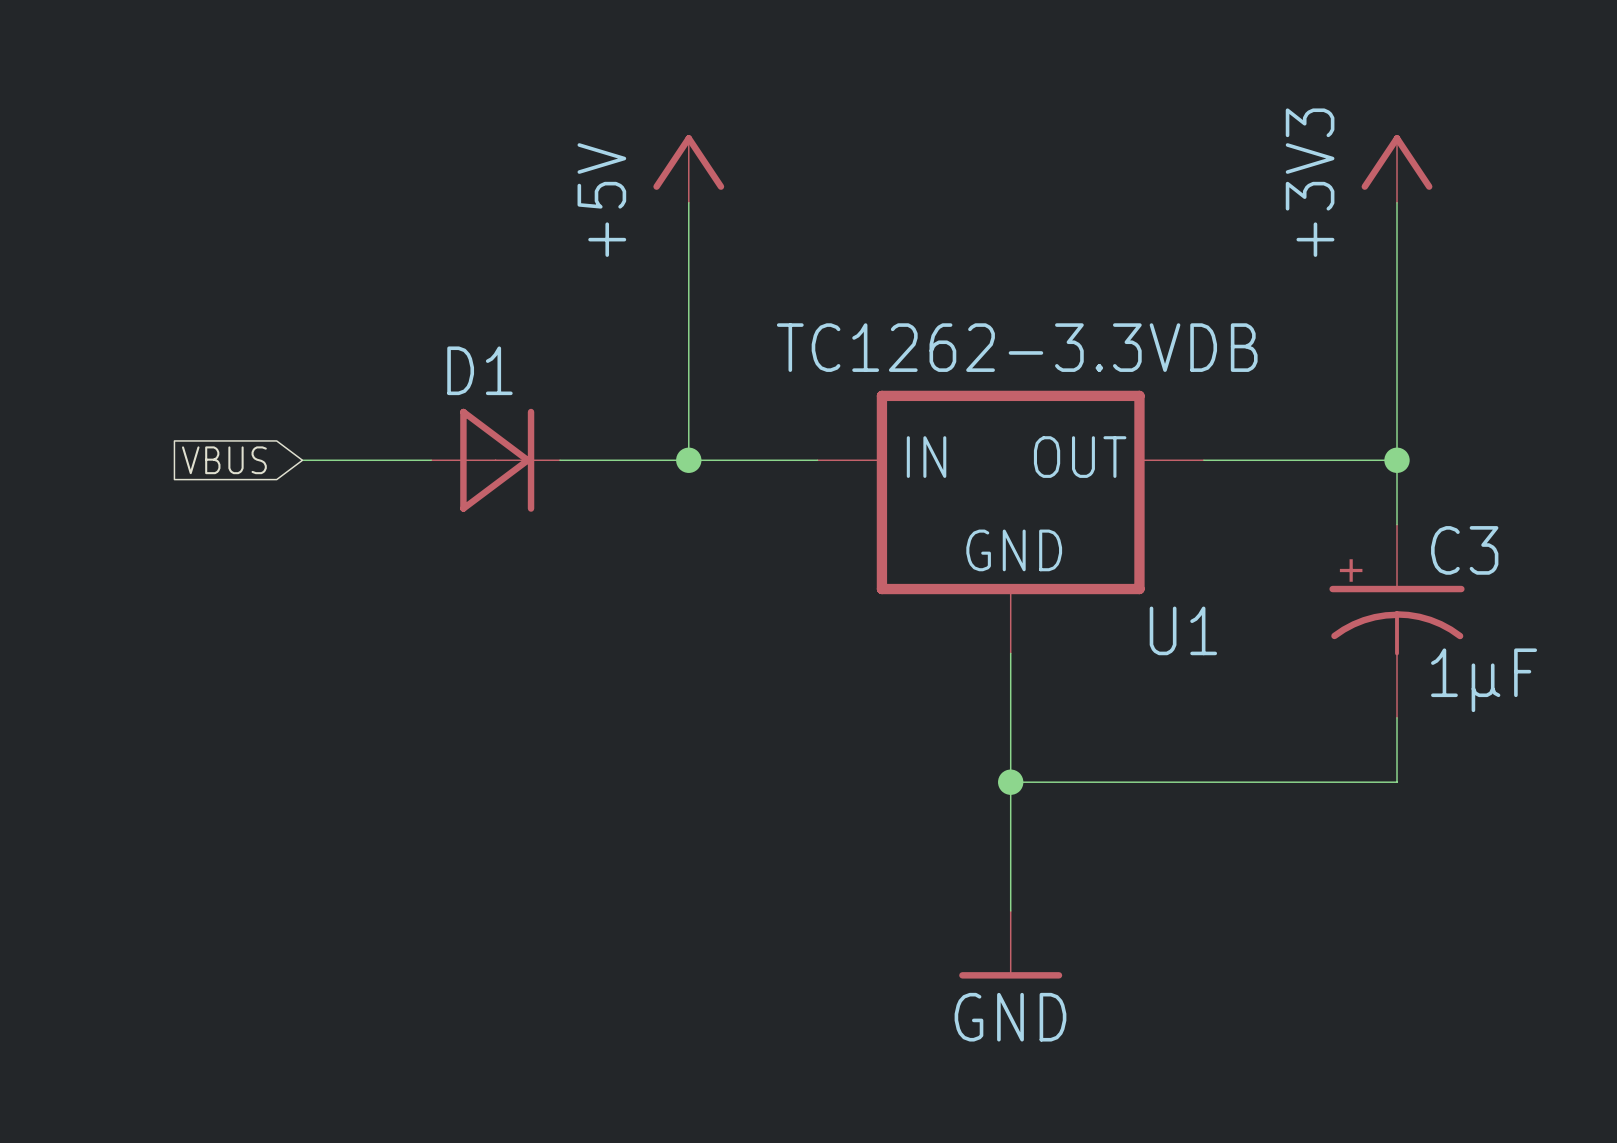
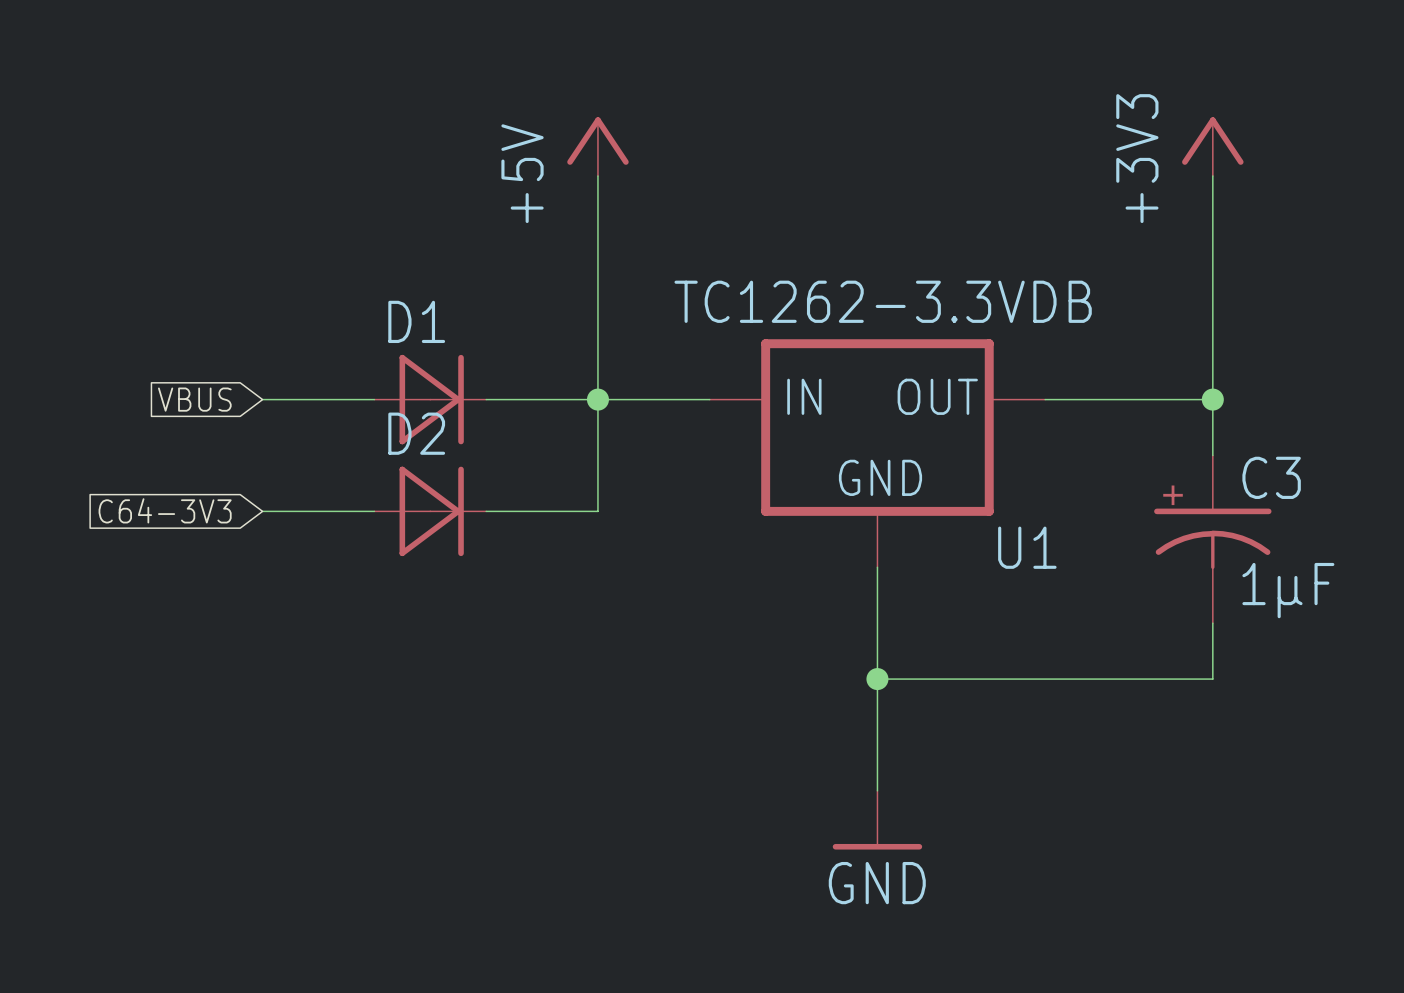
wire: none -> (597, 399) (597, 511) (486, 511)
global label: none -> C64-3V3 (165, 510)
wire: none -> (262, 511) (374, 511)
D2: none -> (430, 511)

